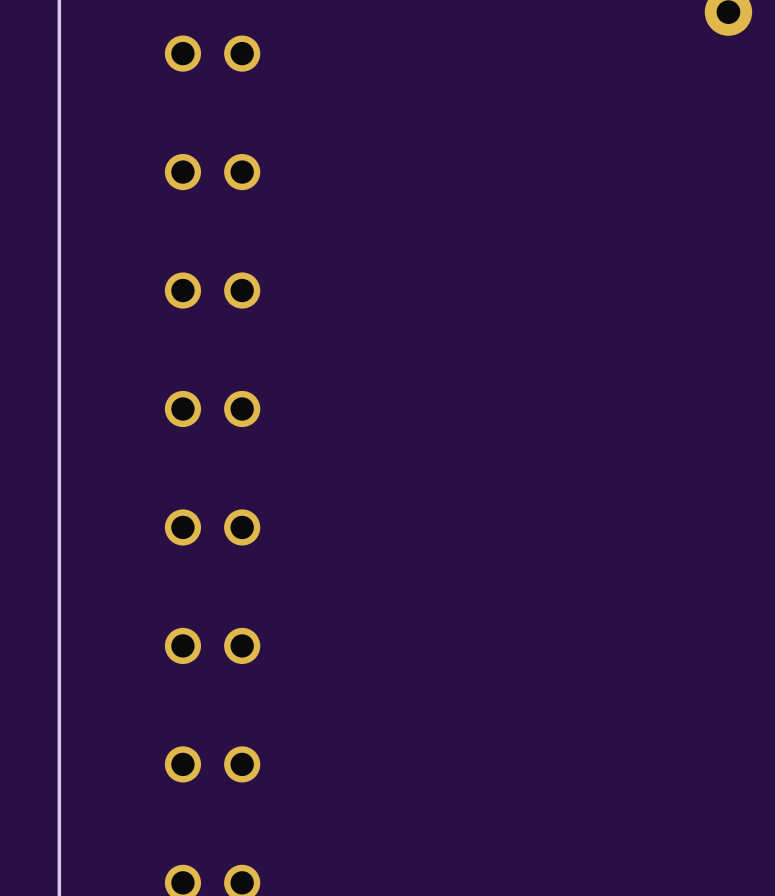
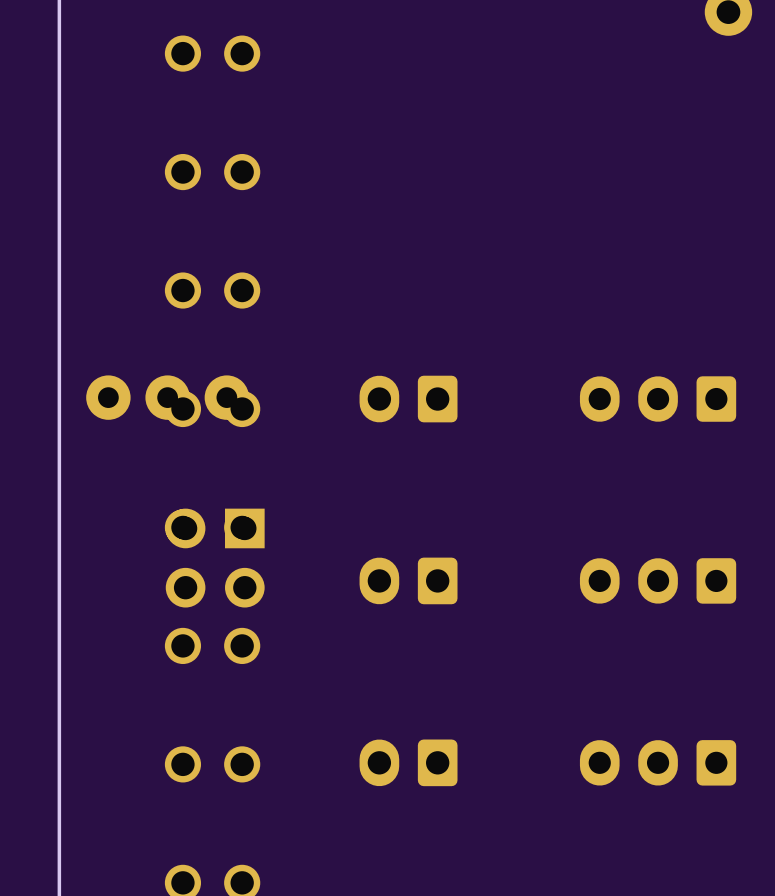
part: none -> (167, 397)
part: none -> (408, 399)
part: none -> (658, 399)
part: none -> (215, 558)
part: none -> (408, 580)
part: none -> (658, 580)
part: none -> (408, 762)
part: none -> (658, 762)

